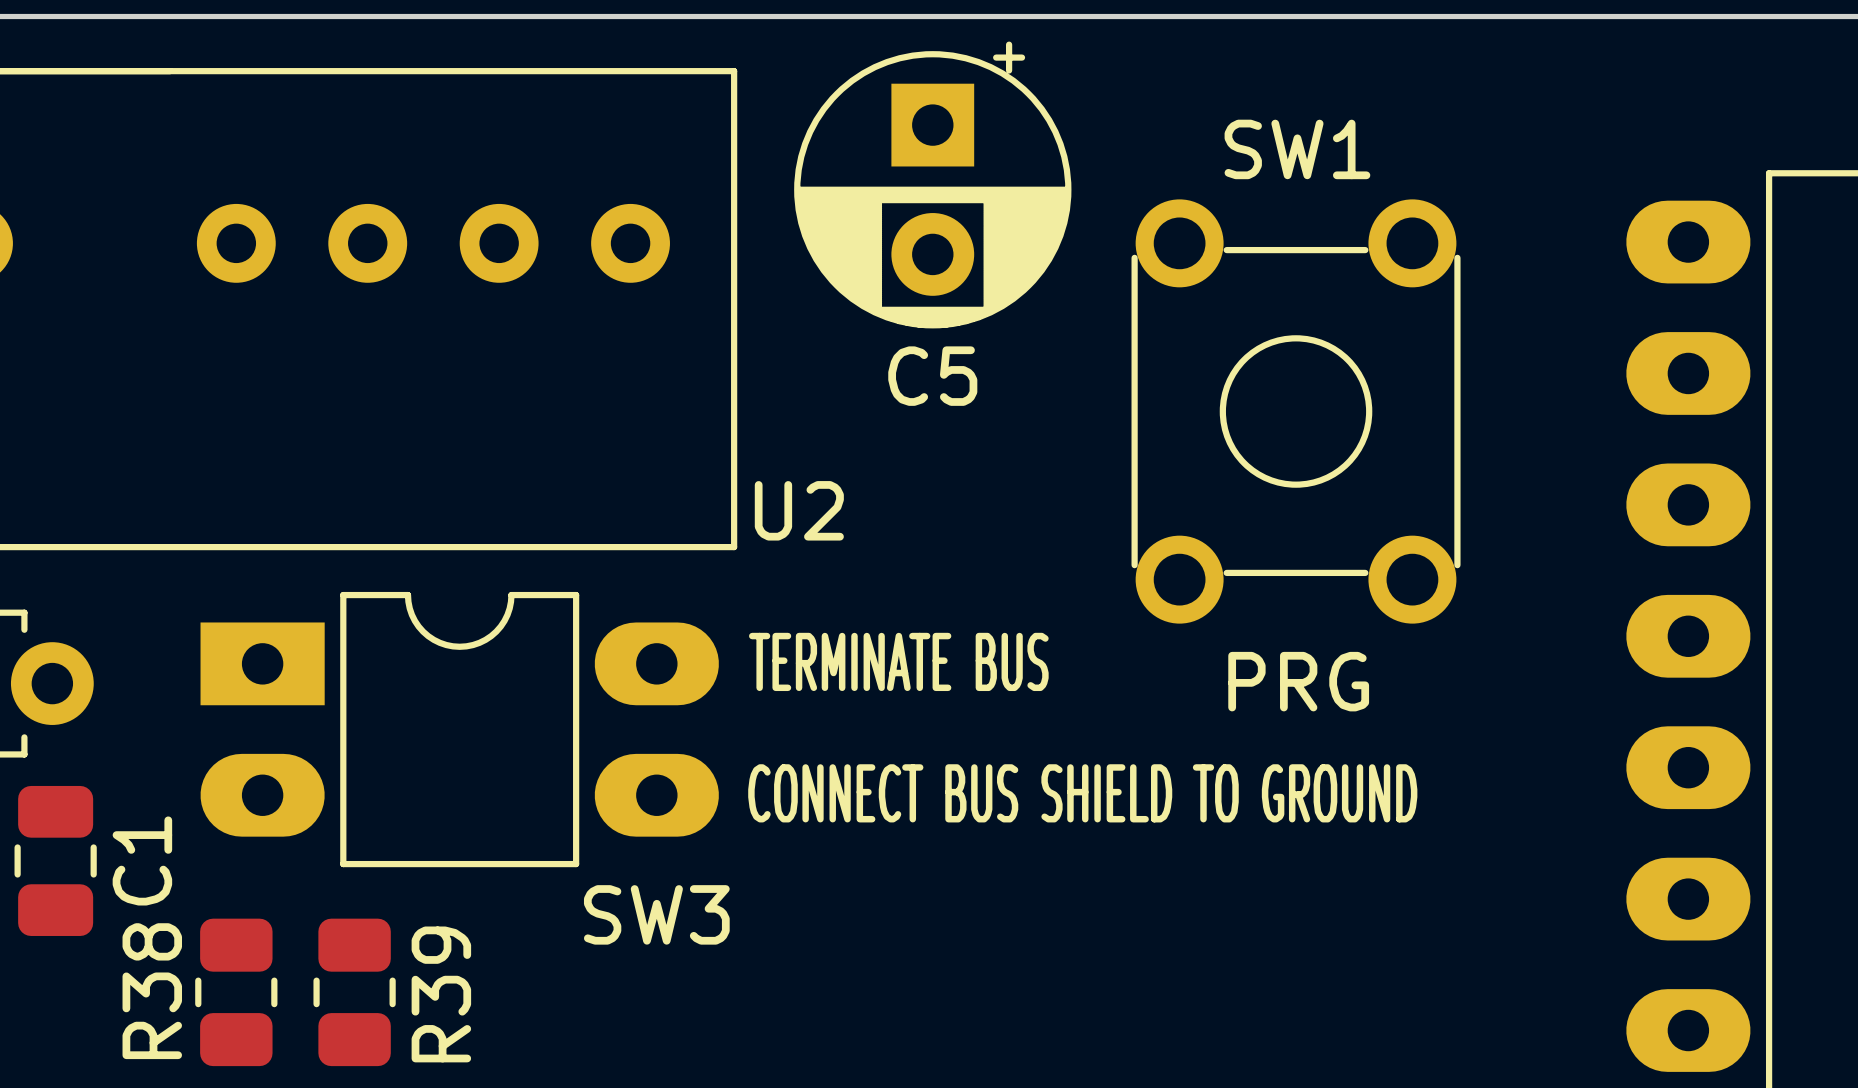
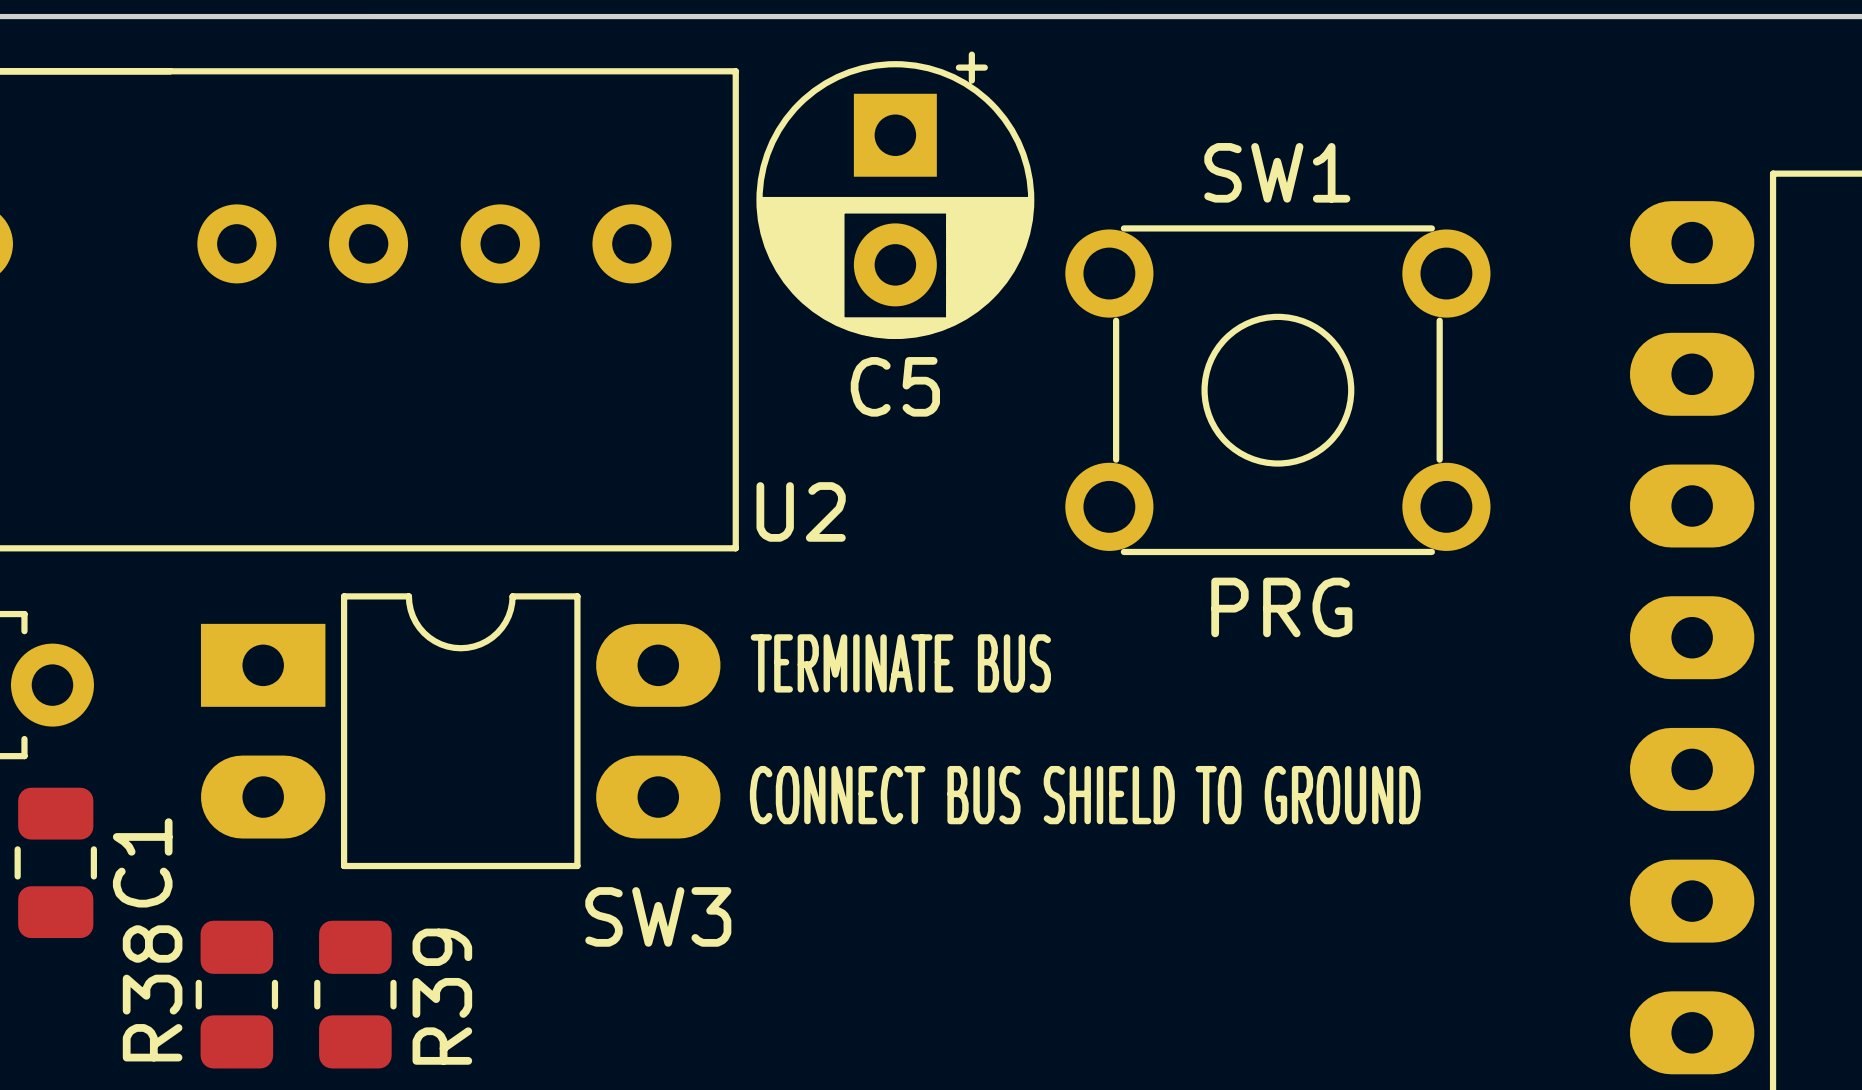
C5 position: (932, 184) -> (895, 195)
SW1 rotation: 0° (1296, 411) -> 90° clockwise (1277, 390)

